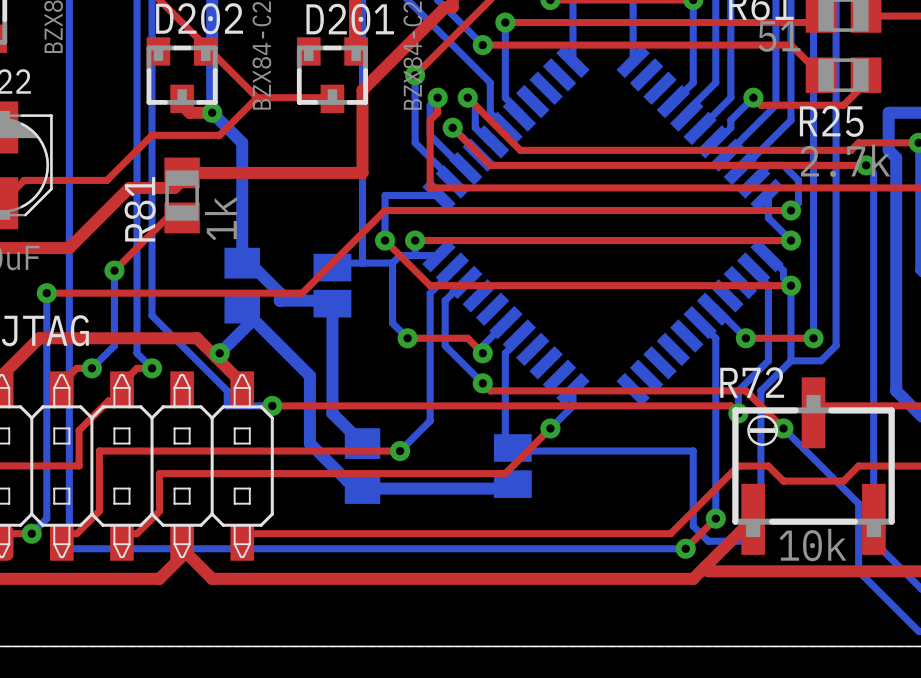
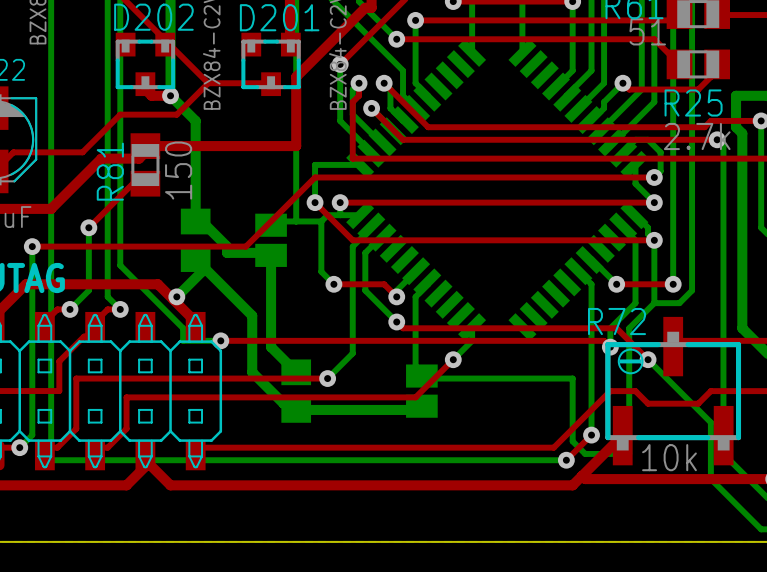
R81 value: 1k (220, 218) -> 150 (178, 170)

